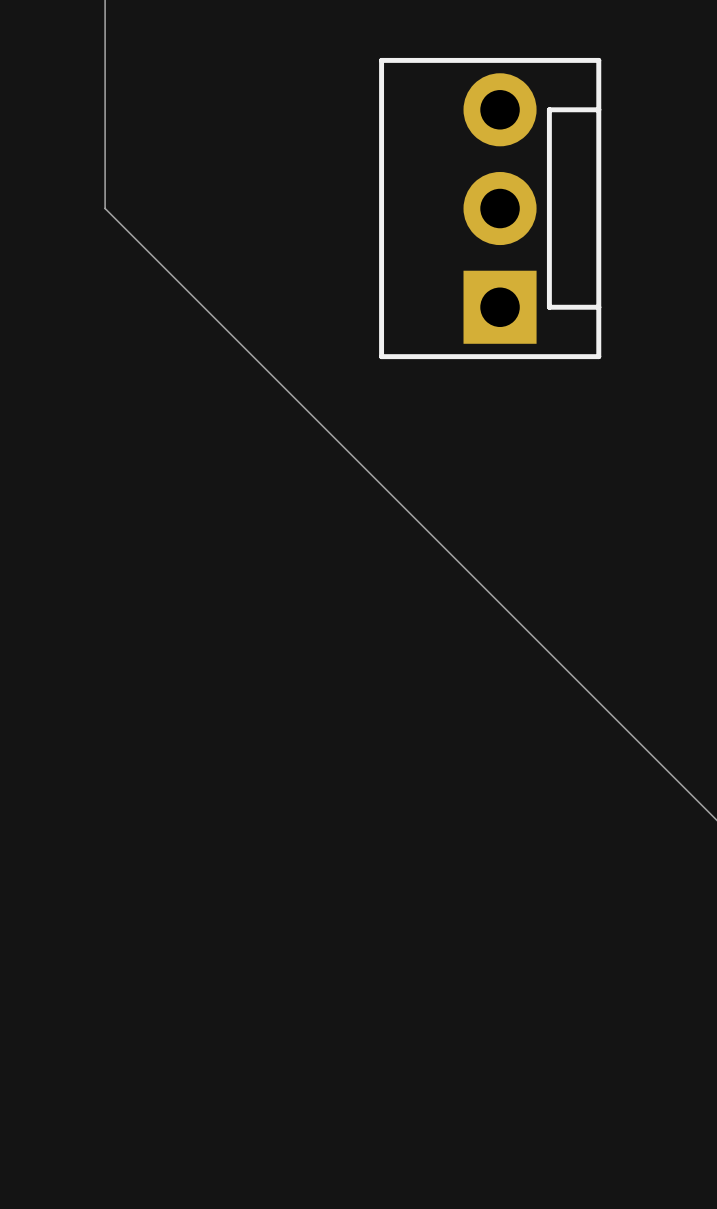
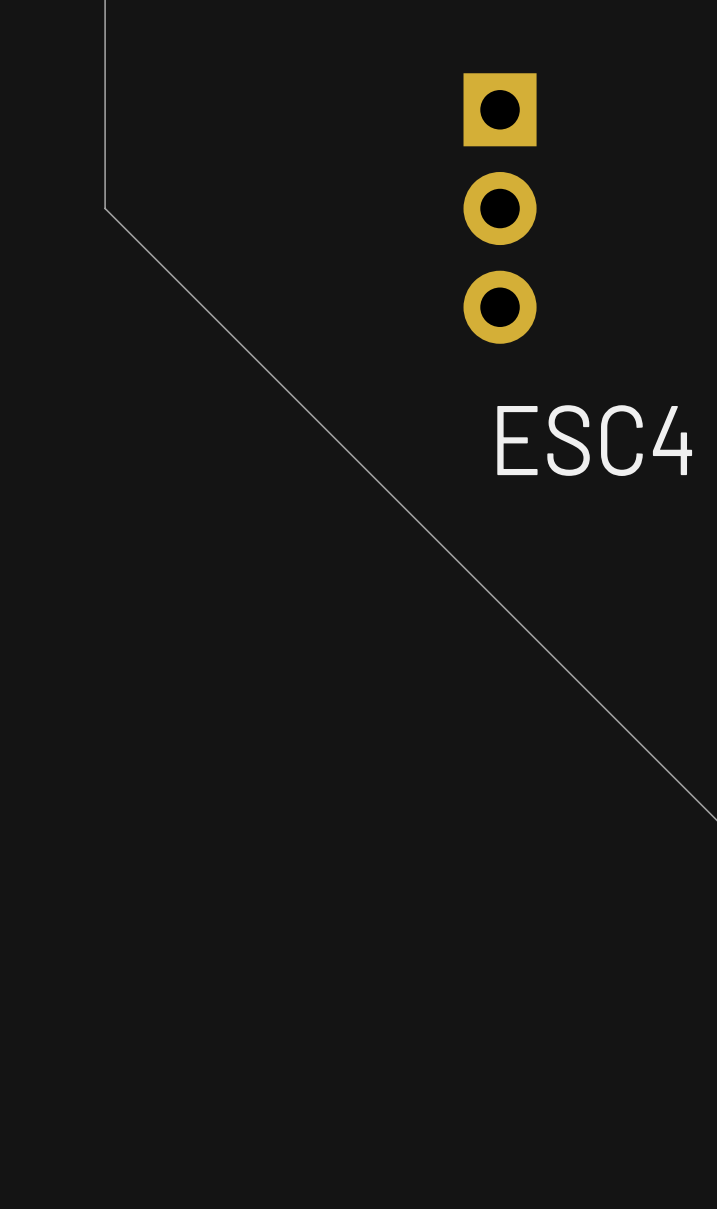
part side: bottom (490, 208) -> top (500, 208)
text: none -> ESC4 (594, 440)

